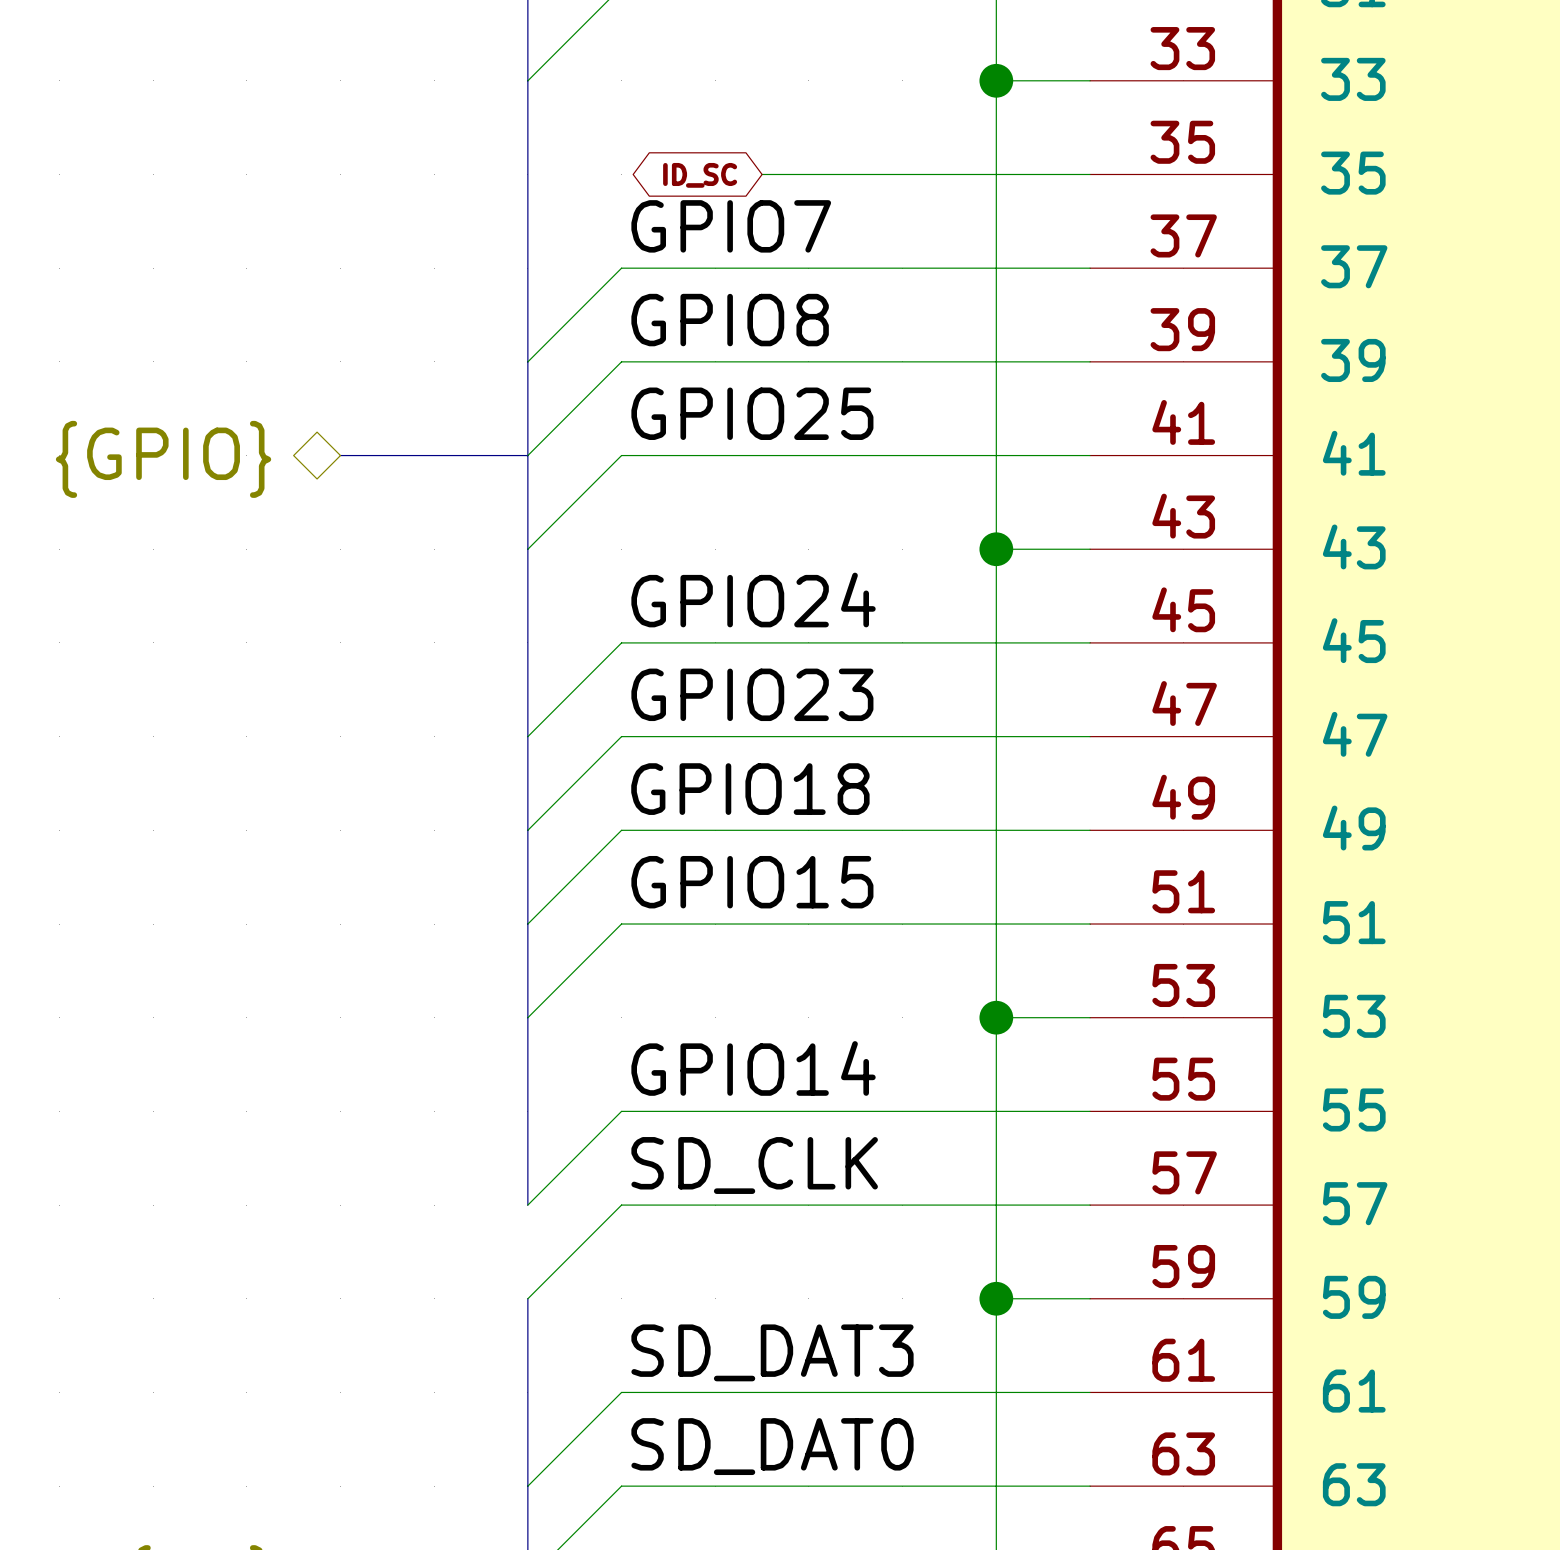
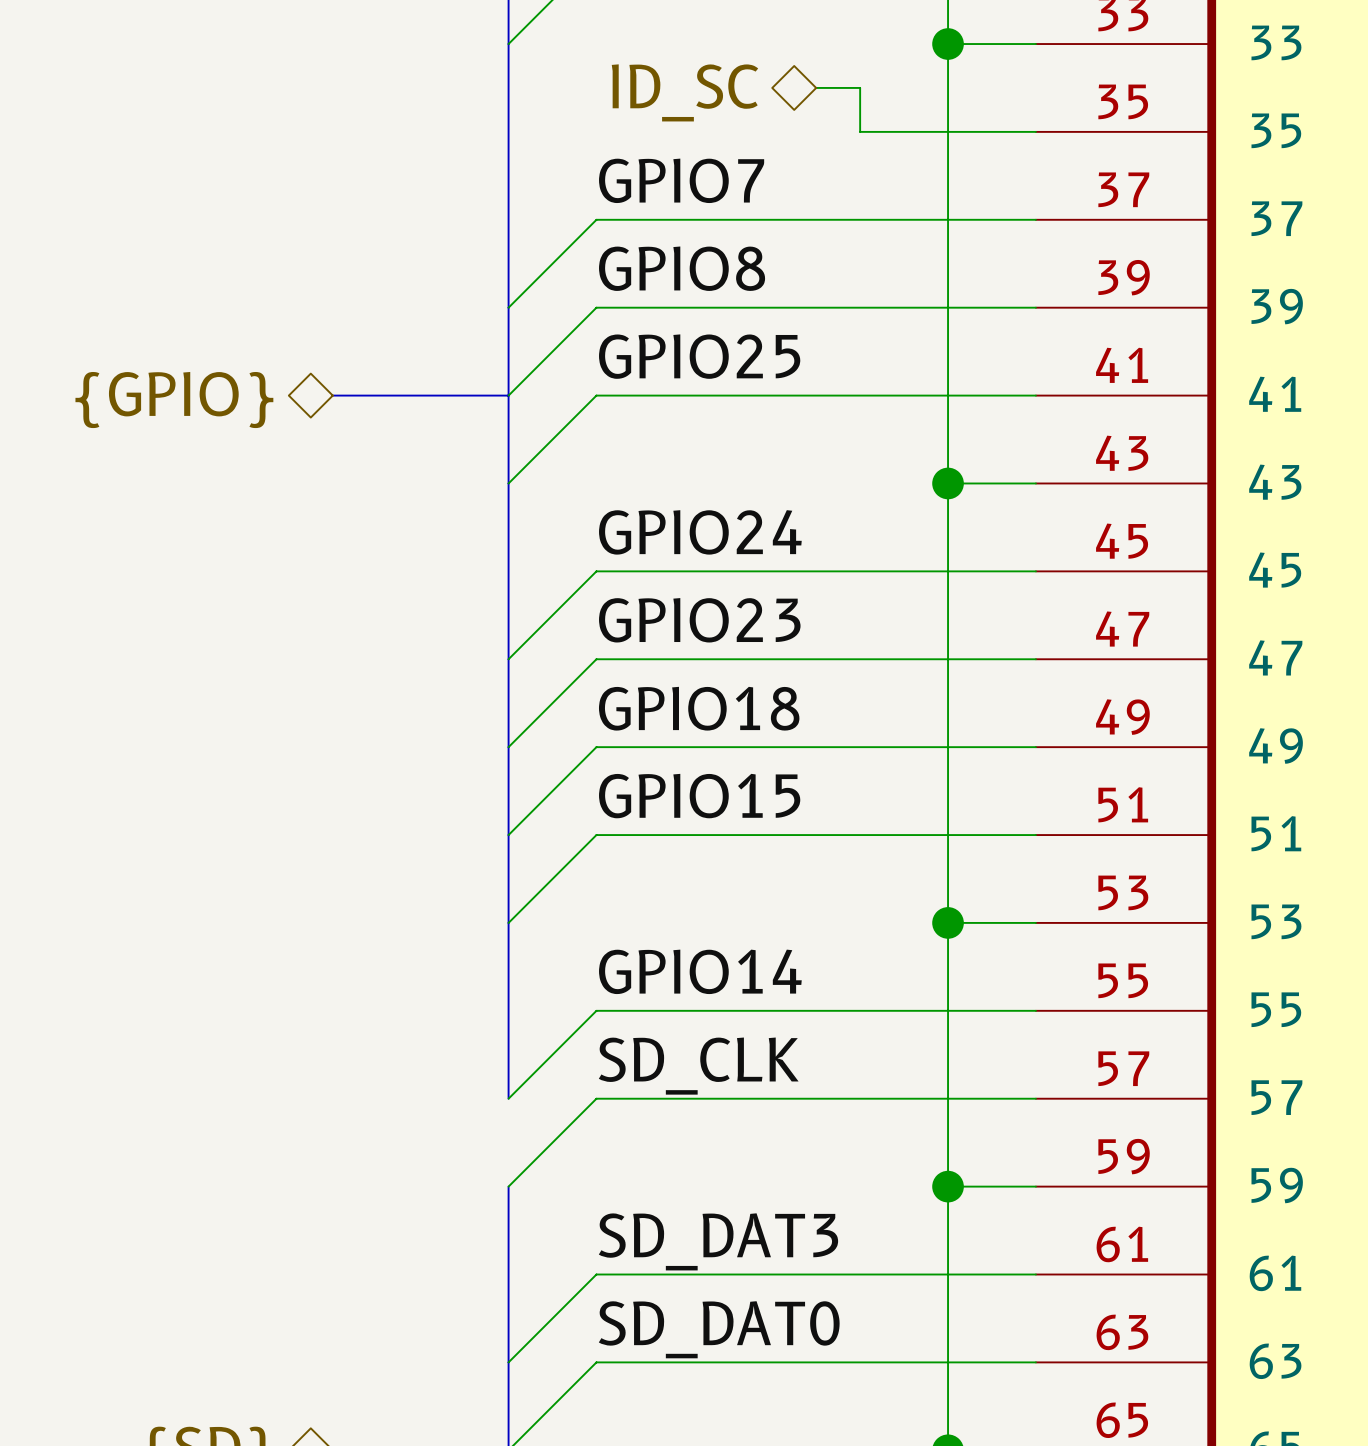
hierarchical label: none -> ID_SC (684, 92)
wire: (762, 174) (902, 174) -> (816, 87) (860, 87) (860, 131)
global label: ID_SC (700, 175) -> none

